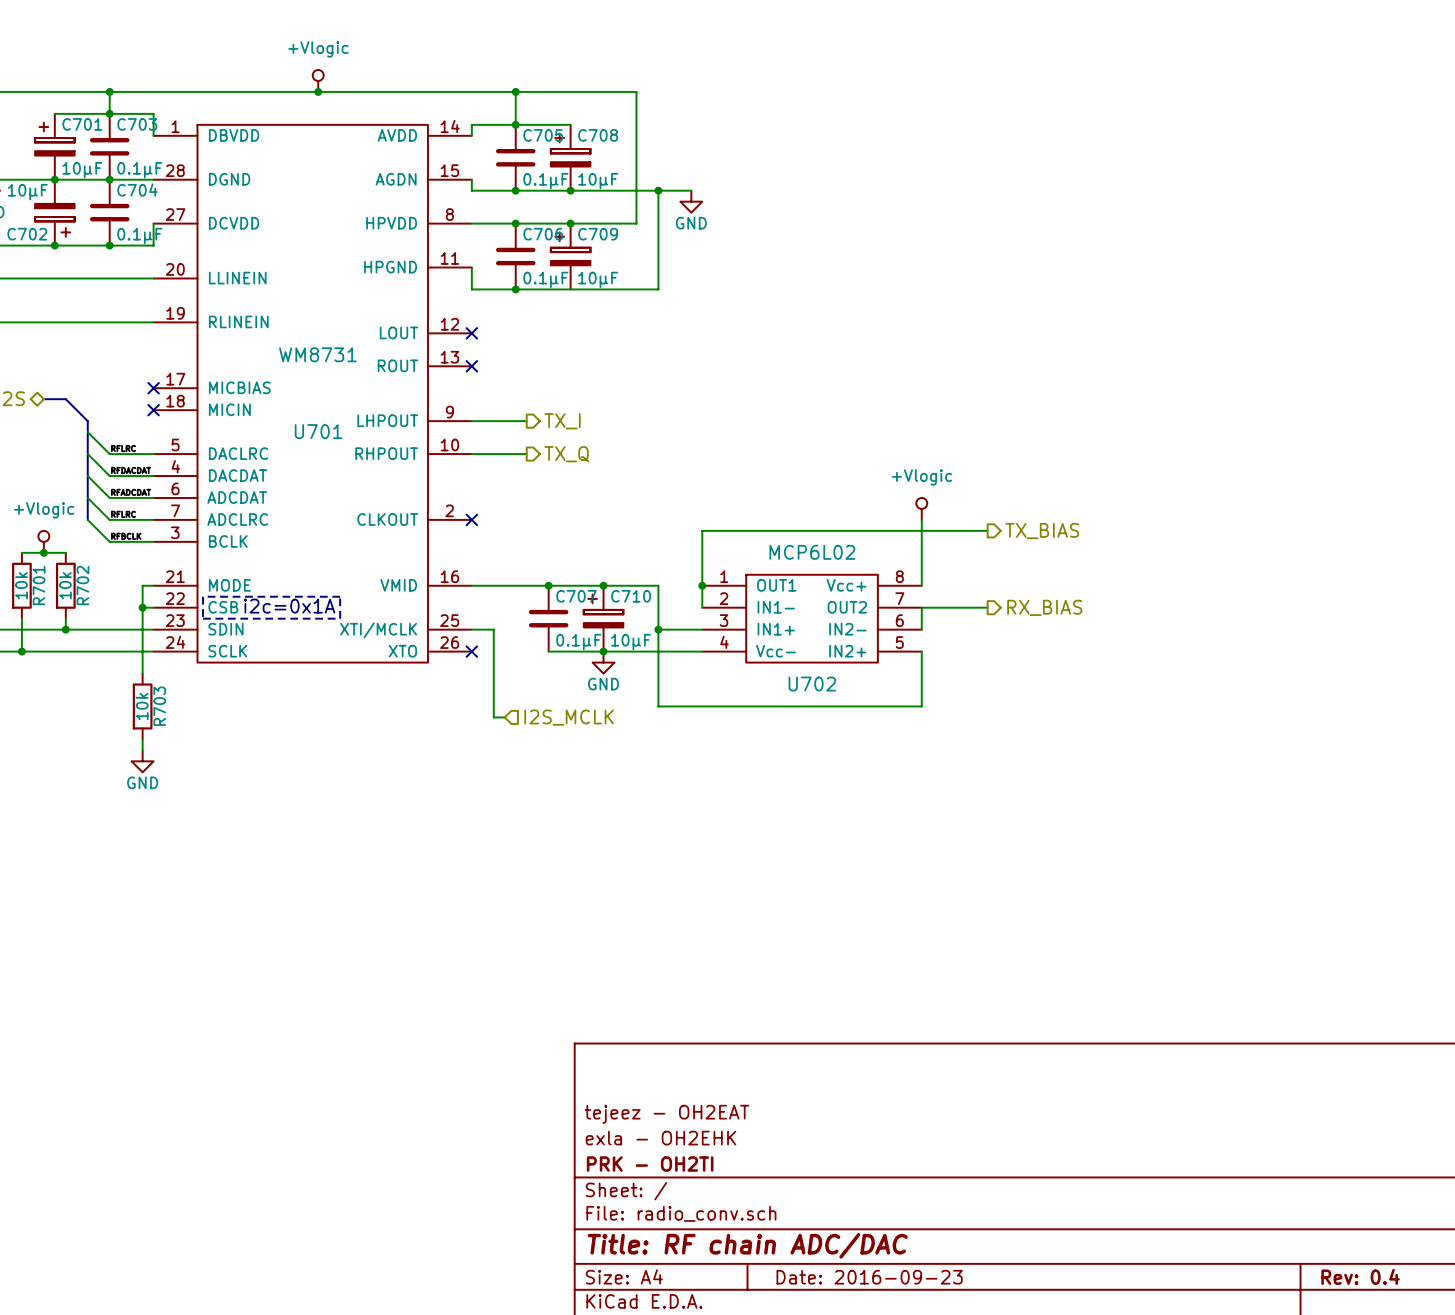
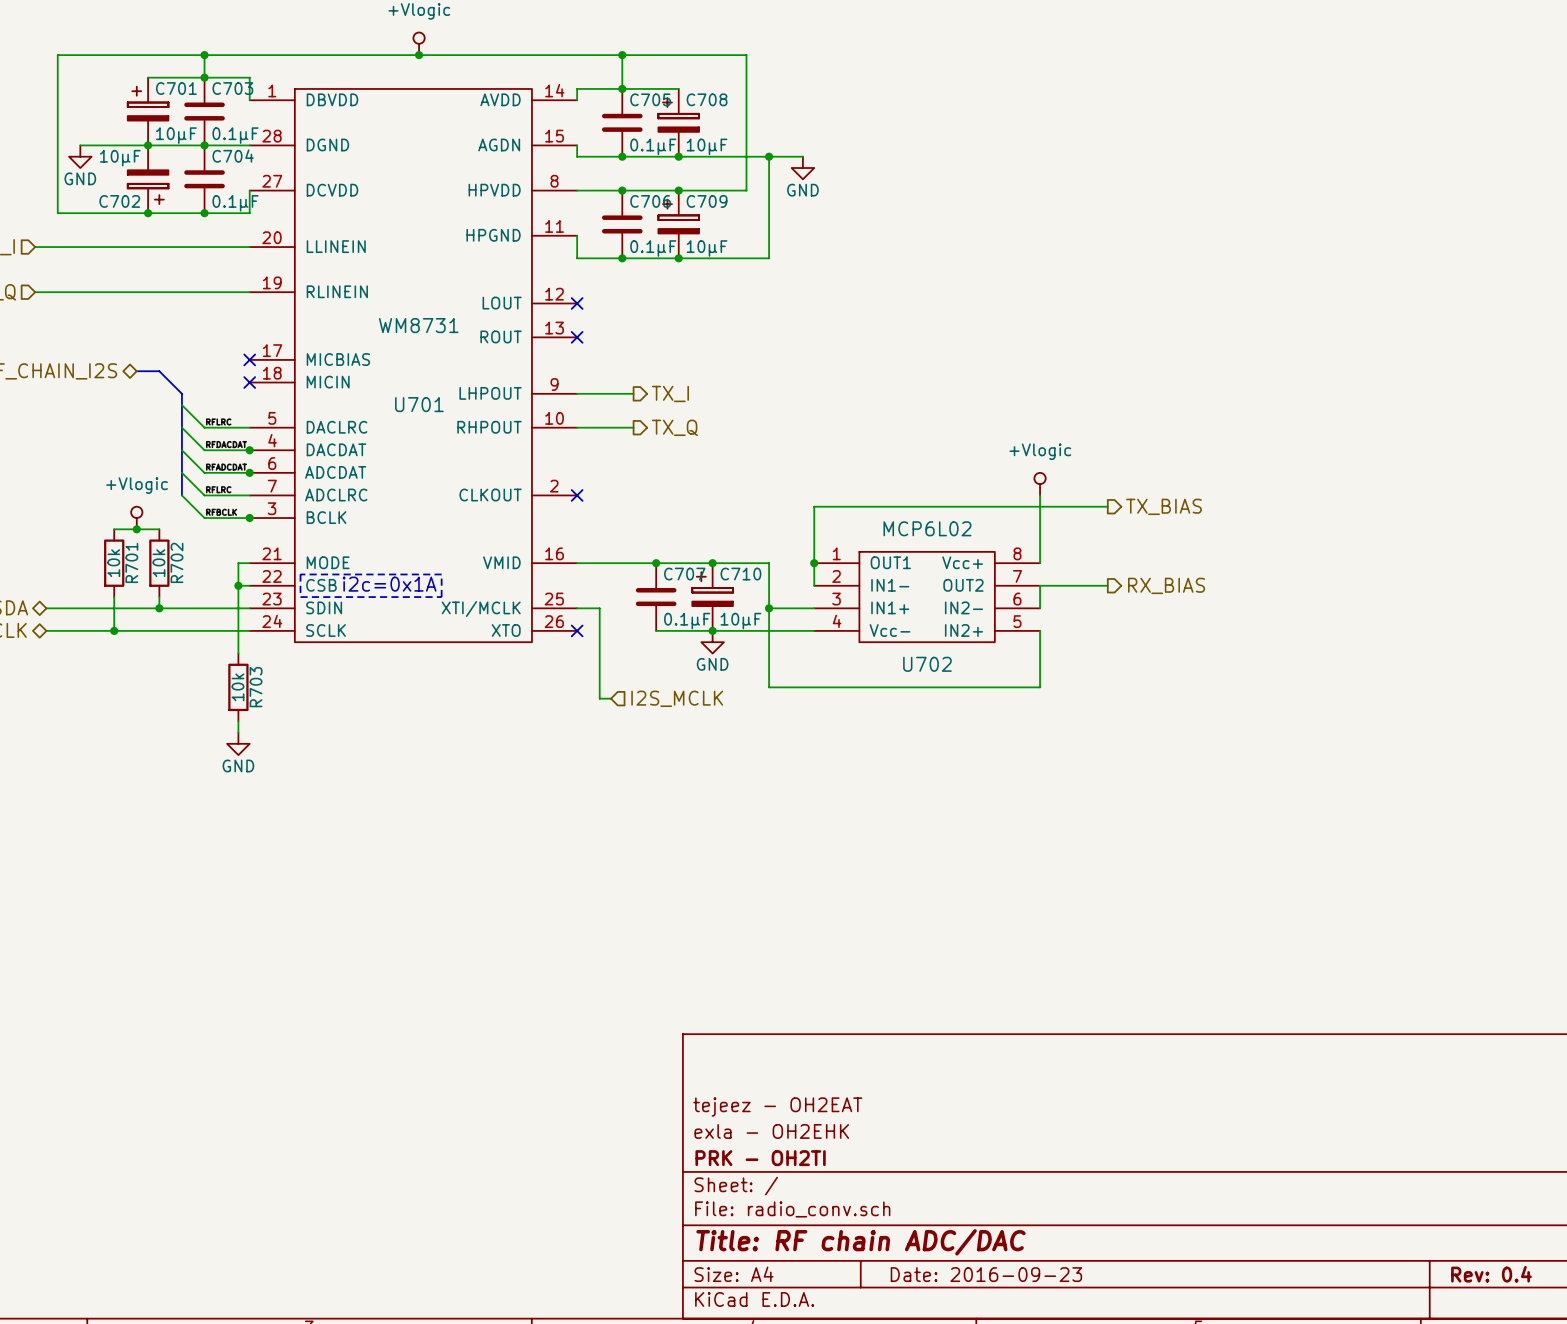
junction: none -> (678, 258)
junction: none -> (249, 450)
junction: none -> (249, 472)
junction: none -> (249, 518)

